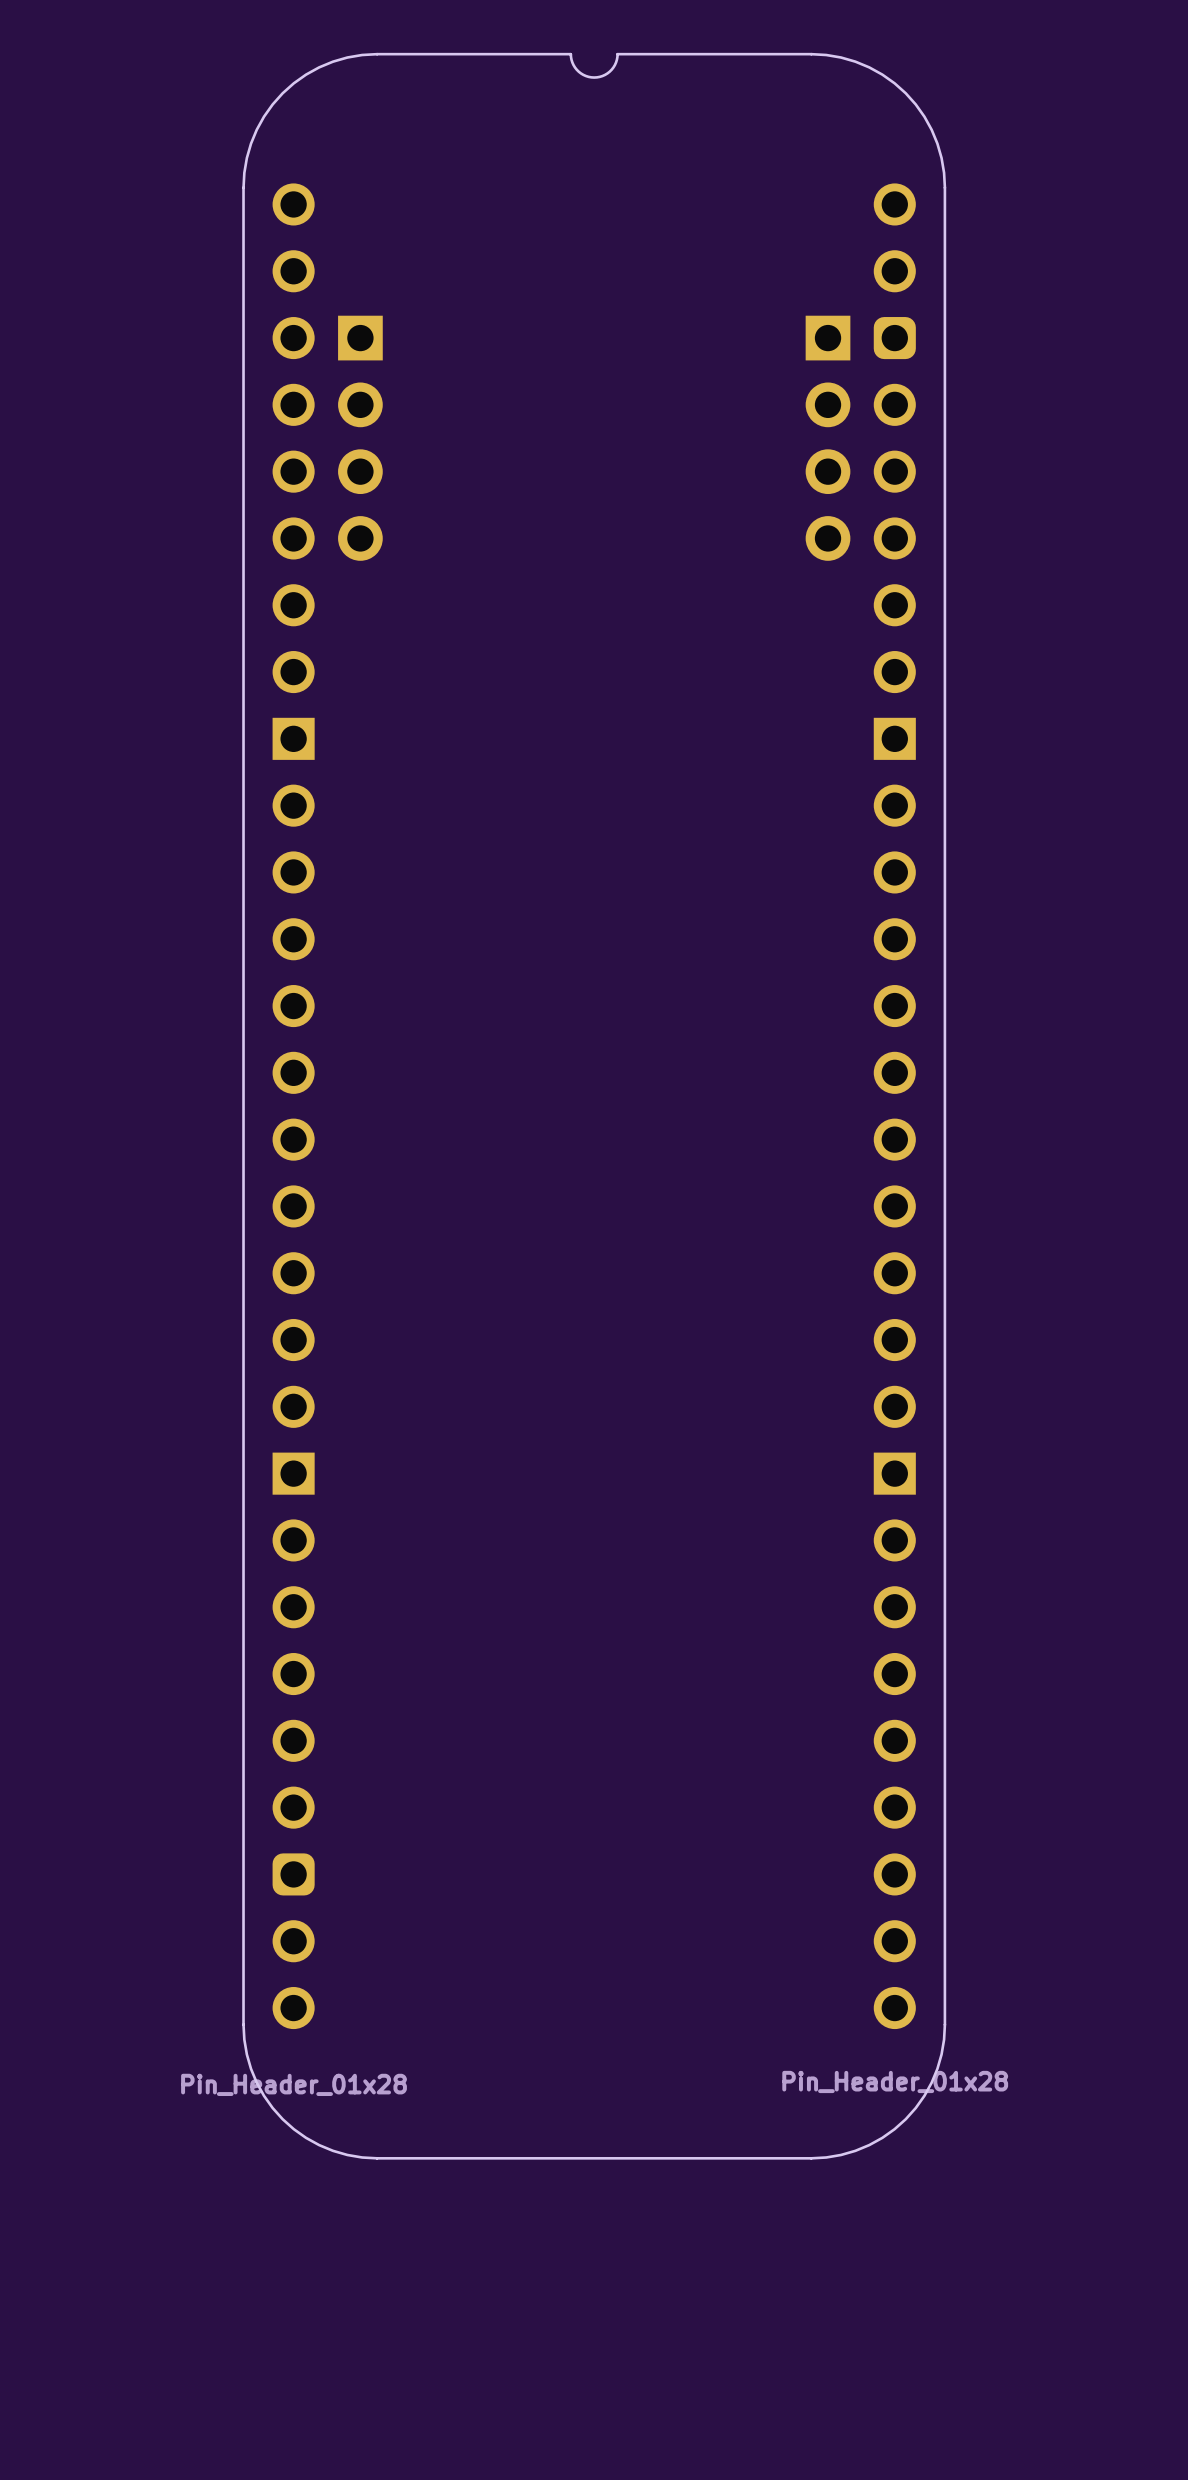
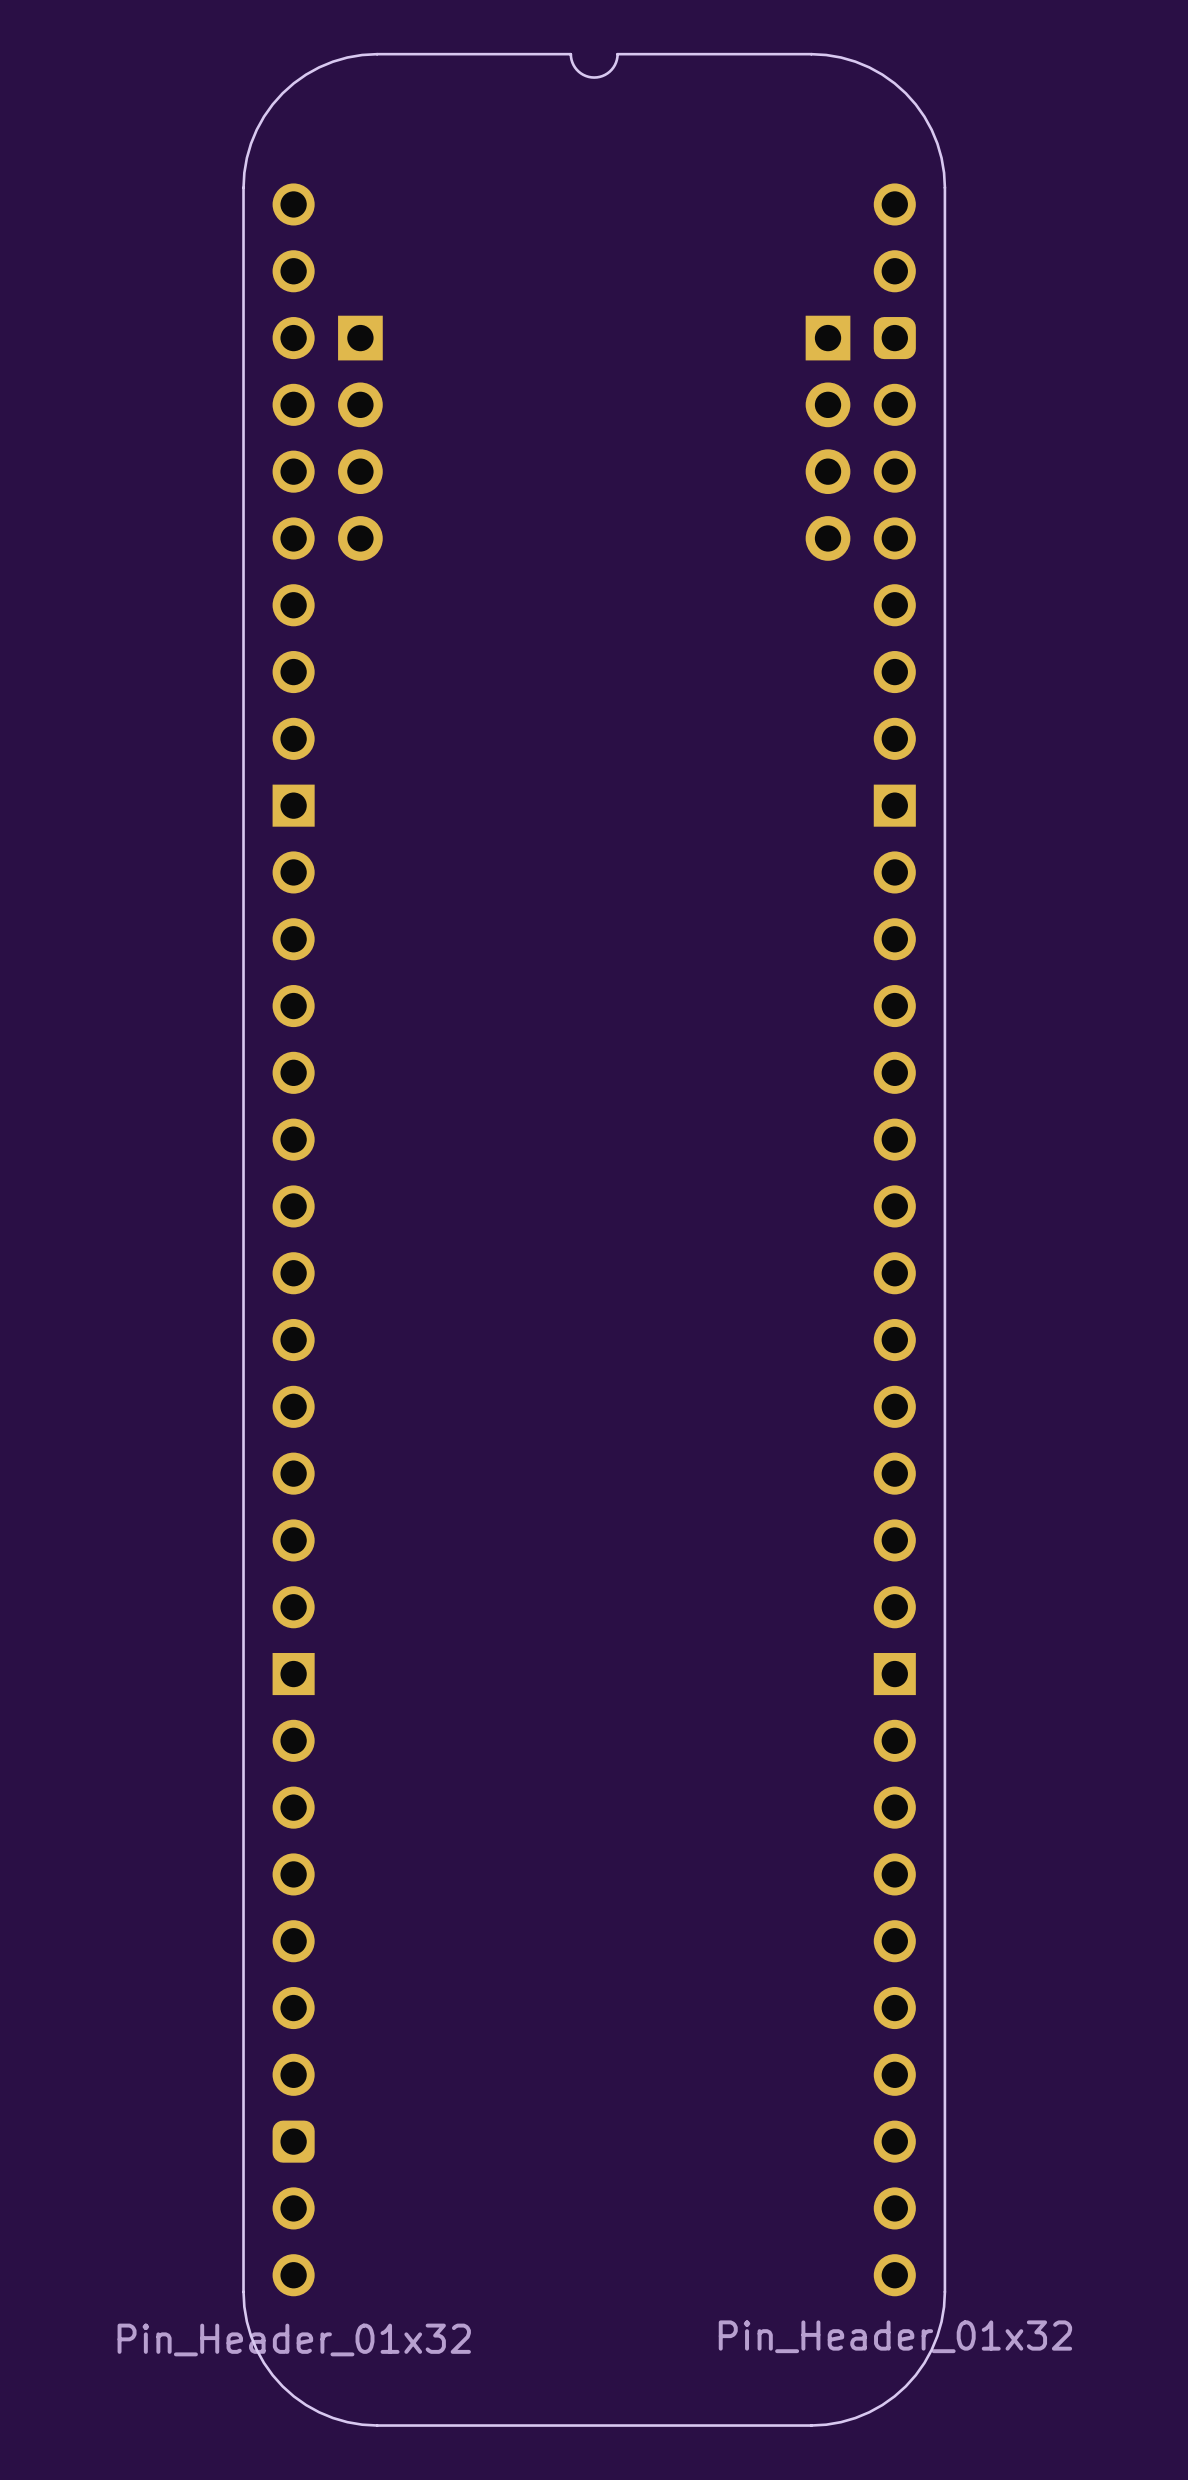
part: (594, 1106) -> none
part: none -> (594, 1239)
drawing: [782, 2070, 1009, 2094] -> none
drawing: [181, 2073, 407, 2097] -> none
drawing: none -> [718, 2320, 1073, 2354]
drawing: none -> [117, 2323, 471, 2357]

